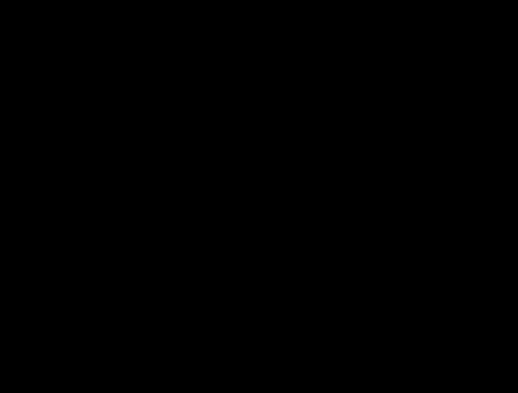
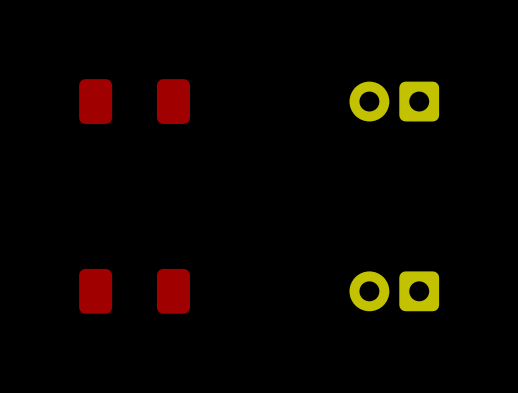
part: none -> (134, 101)
part: none -> (394, 101)
part: none -> (134, 291)
part: none -> (394, 291)

